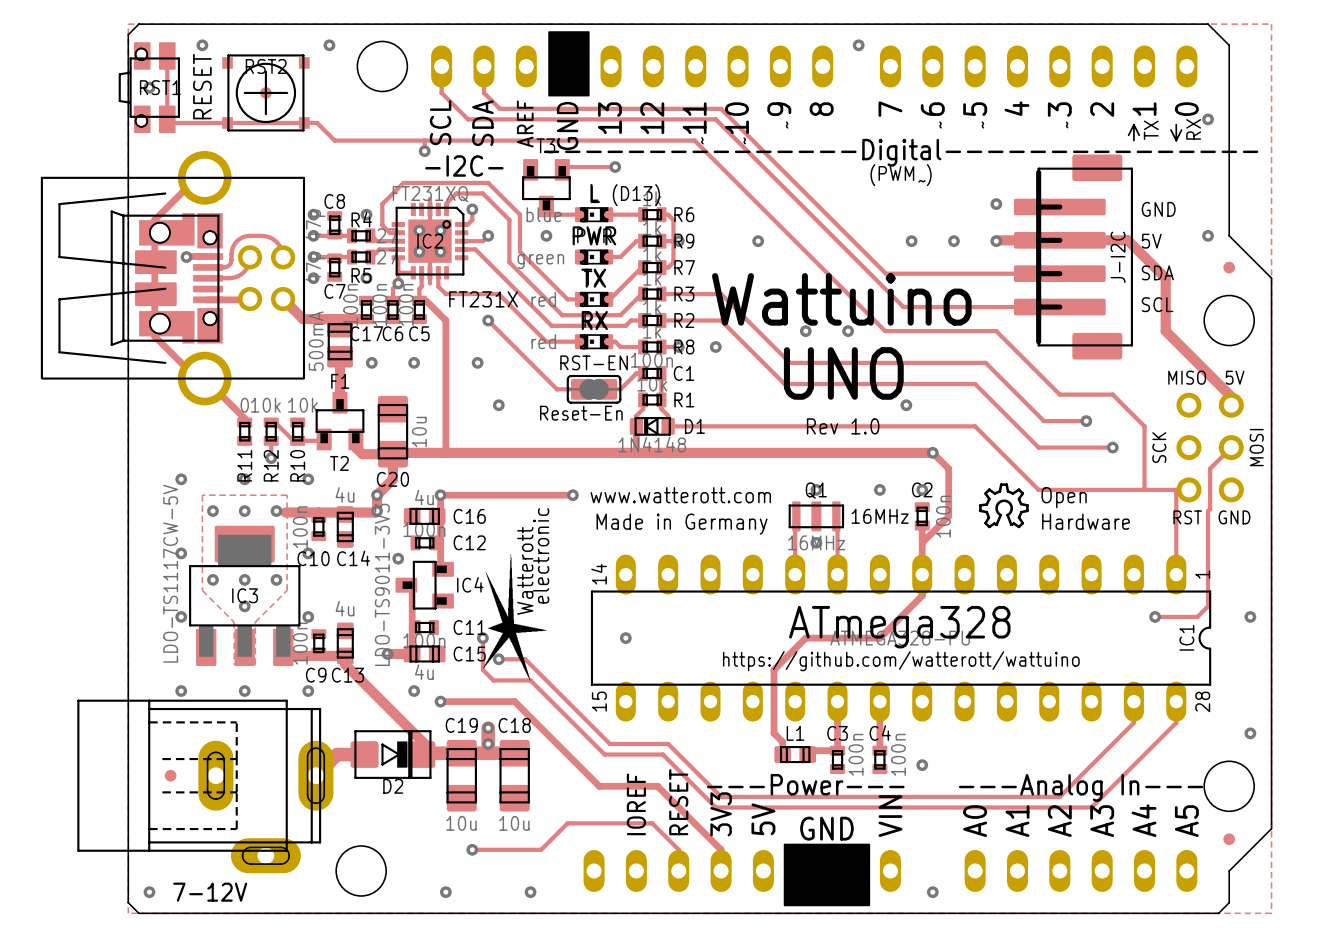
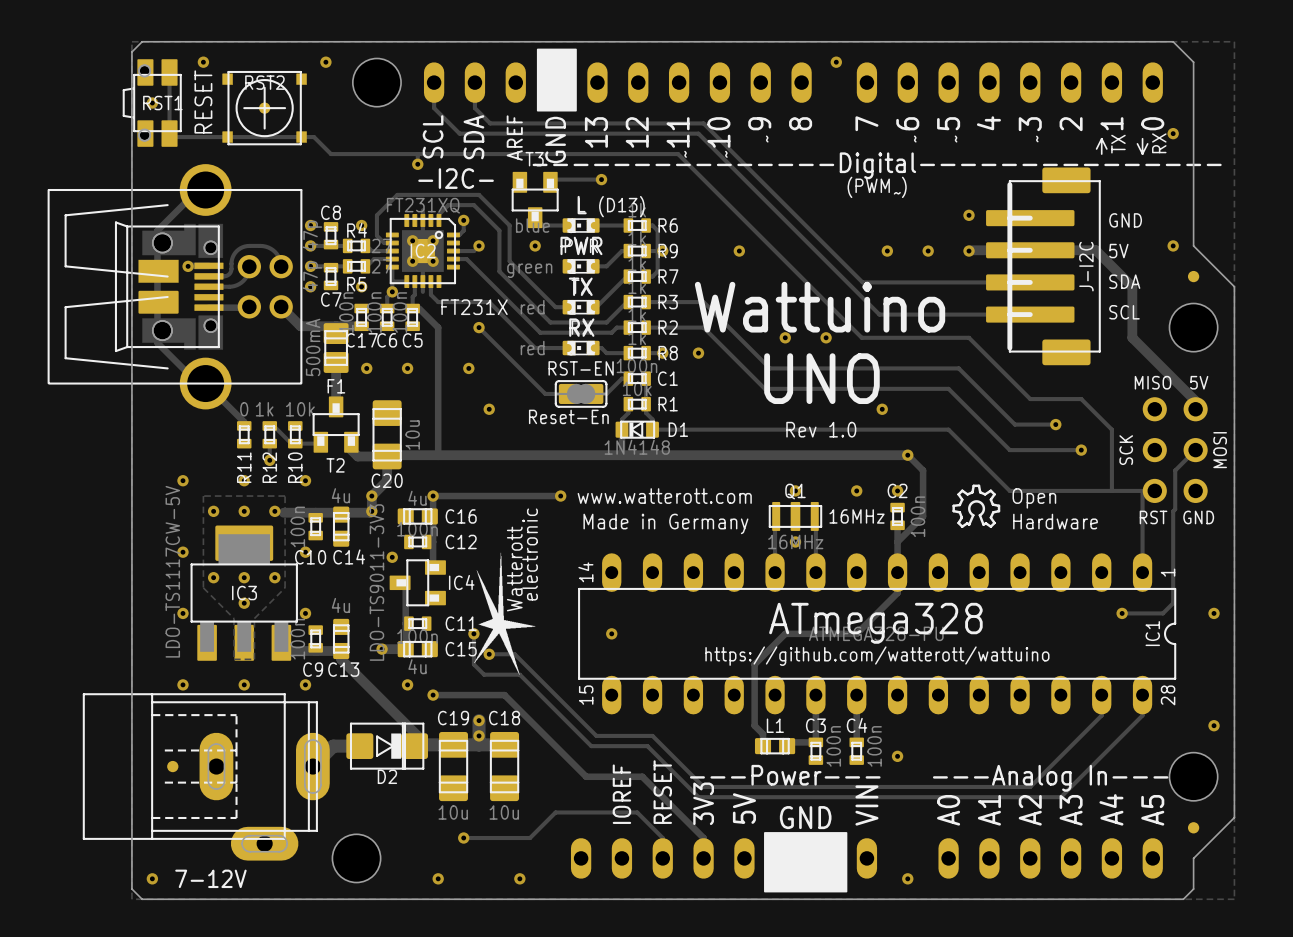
R12 value: 10k (265, 405) -> 1k (264, 409)

